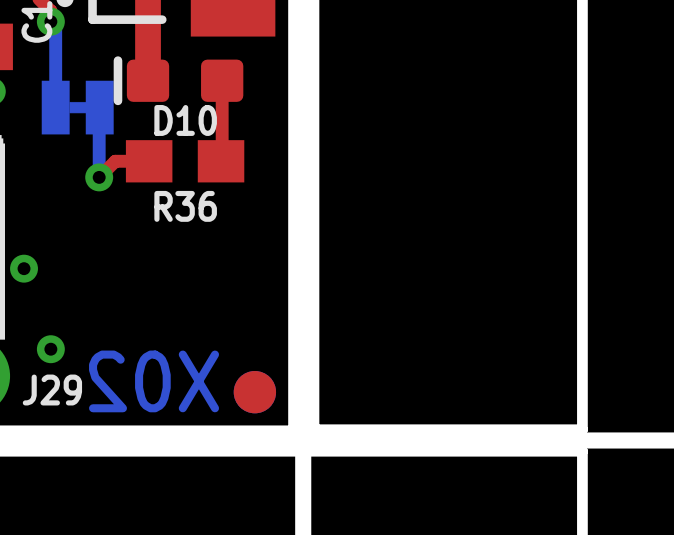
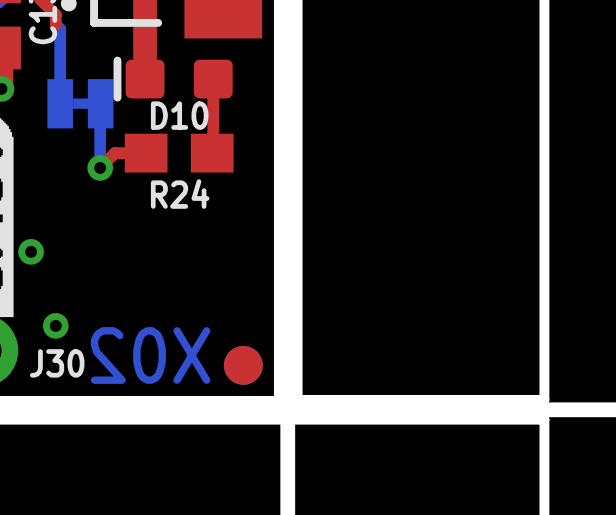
via: (50, 21) -> none
R36 name: R36 (185, 206) -> R24 (180, 194)
J29 name: J29 (52, 390) -> J30 (57, 363)

